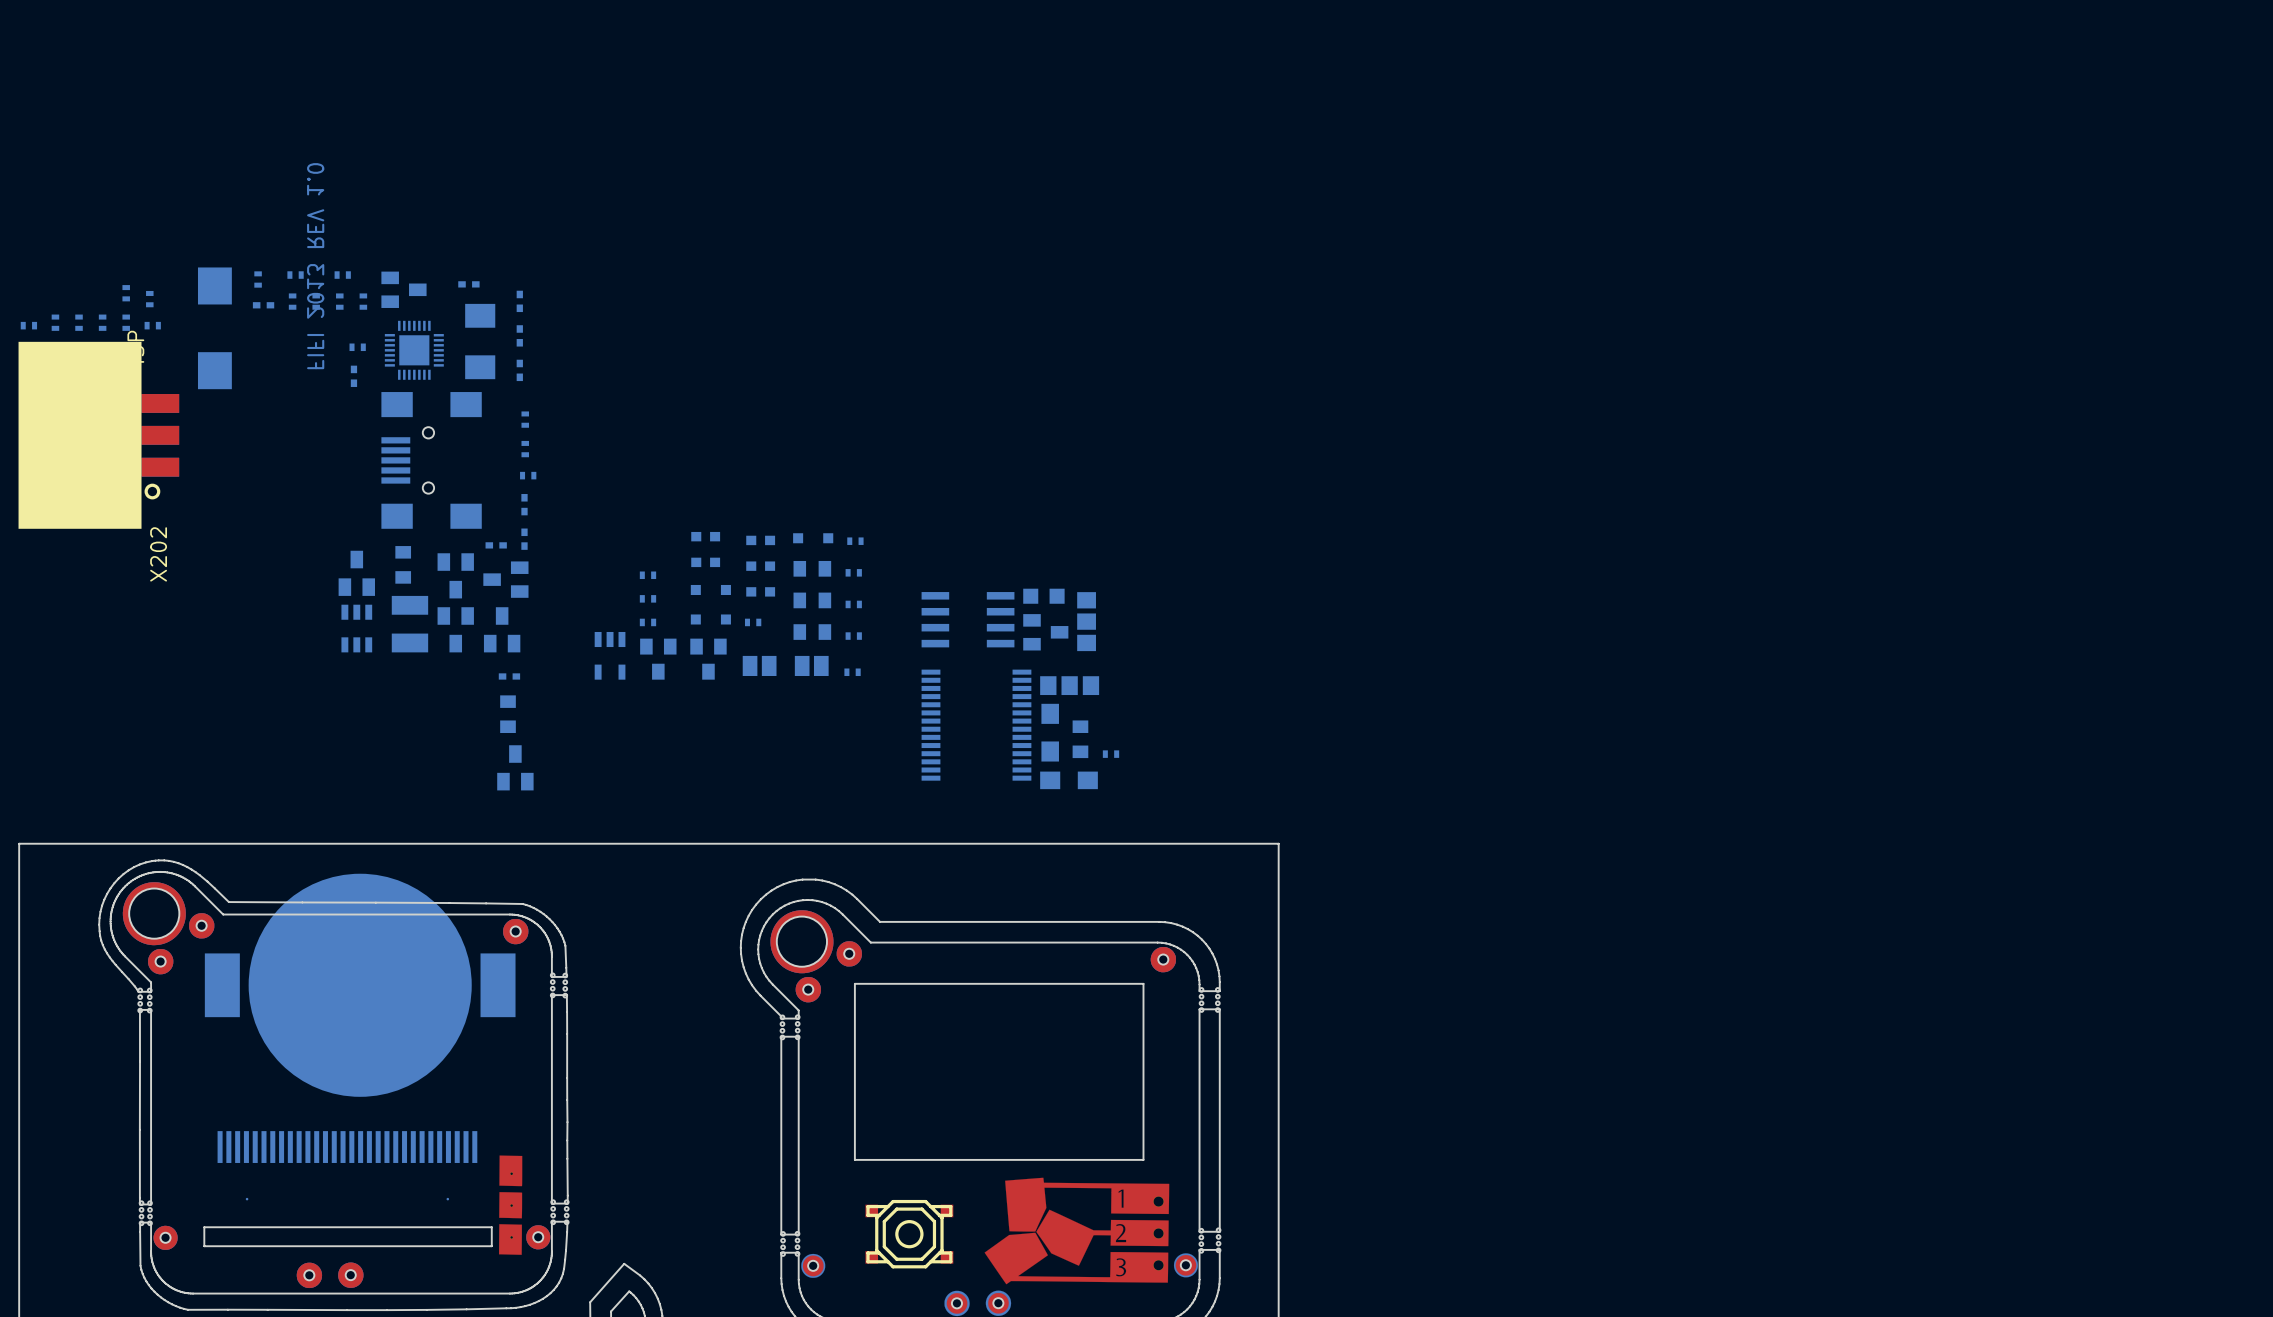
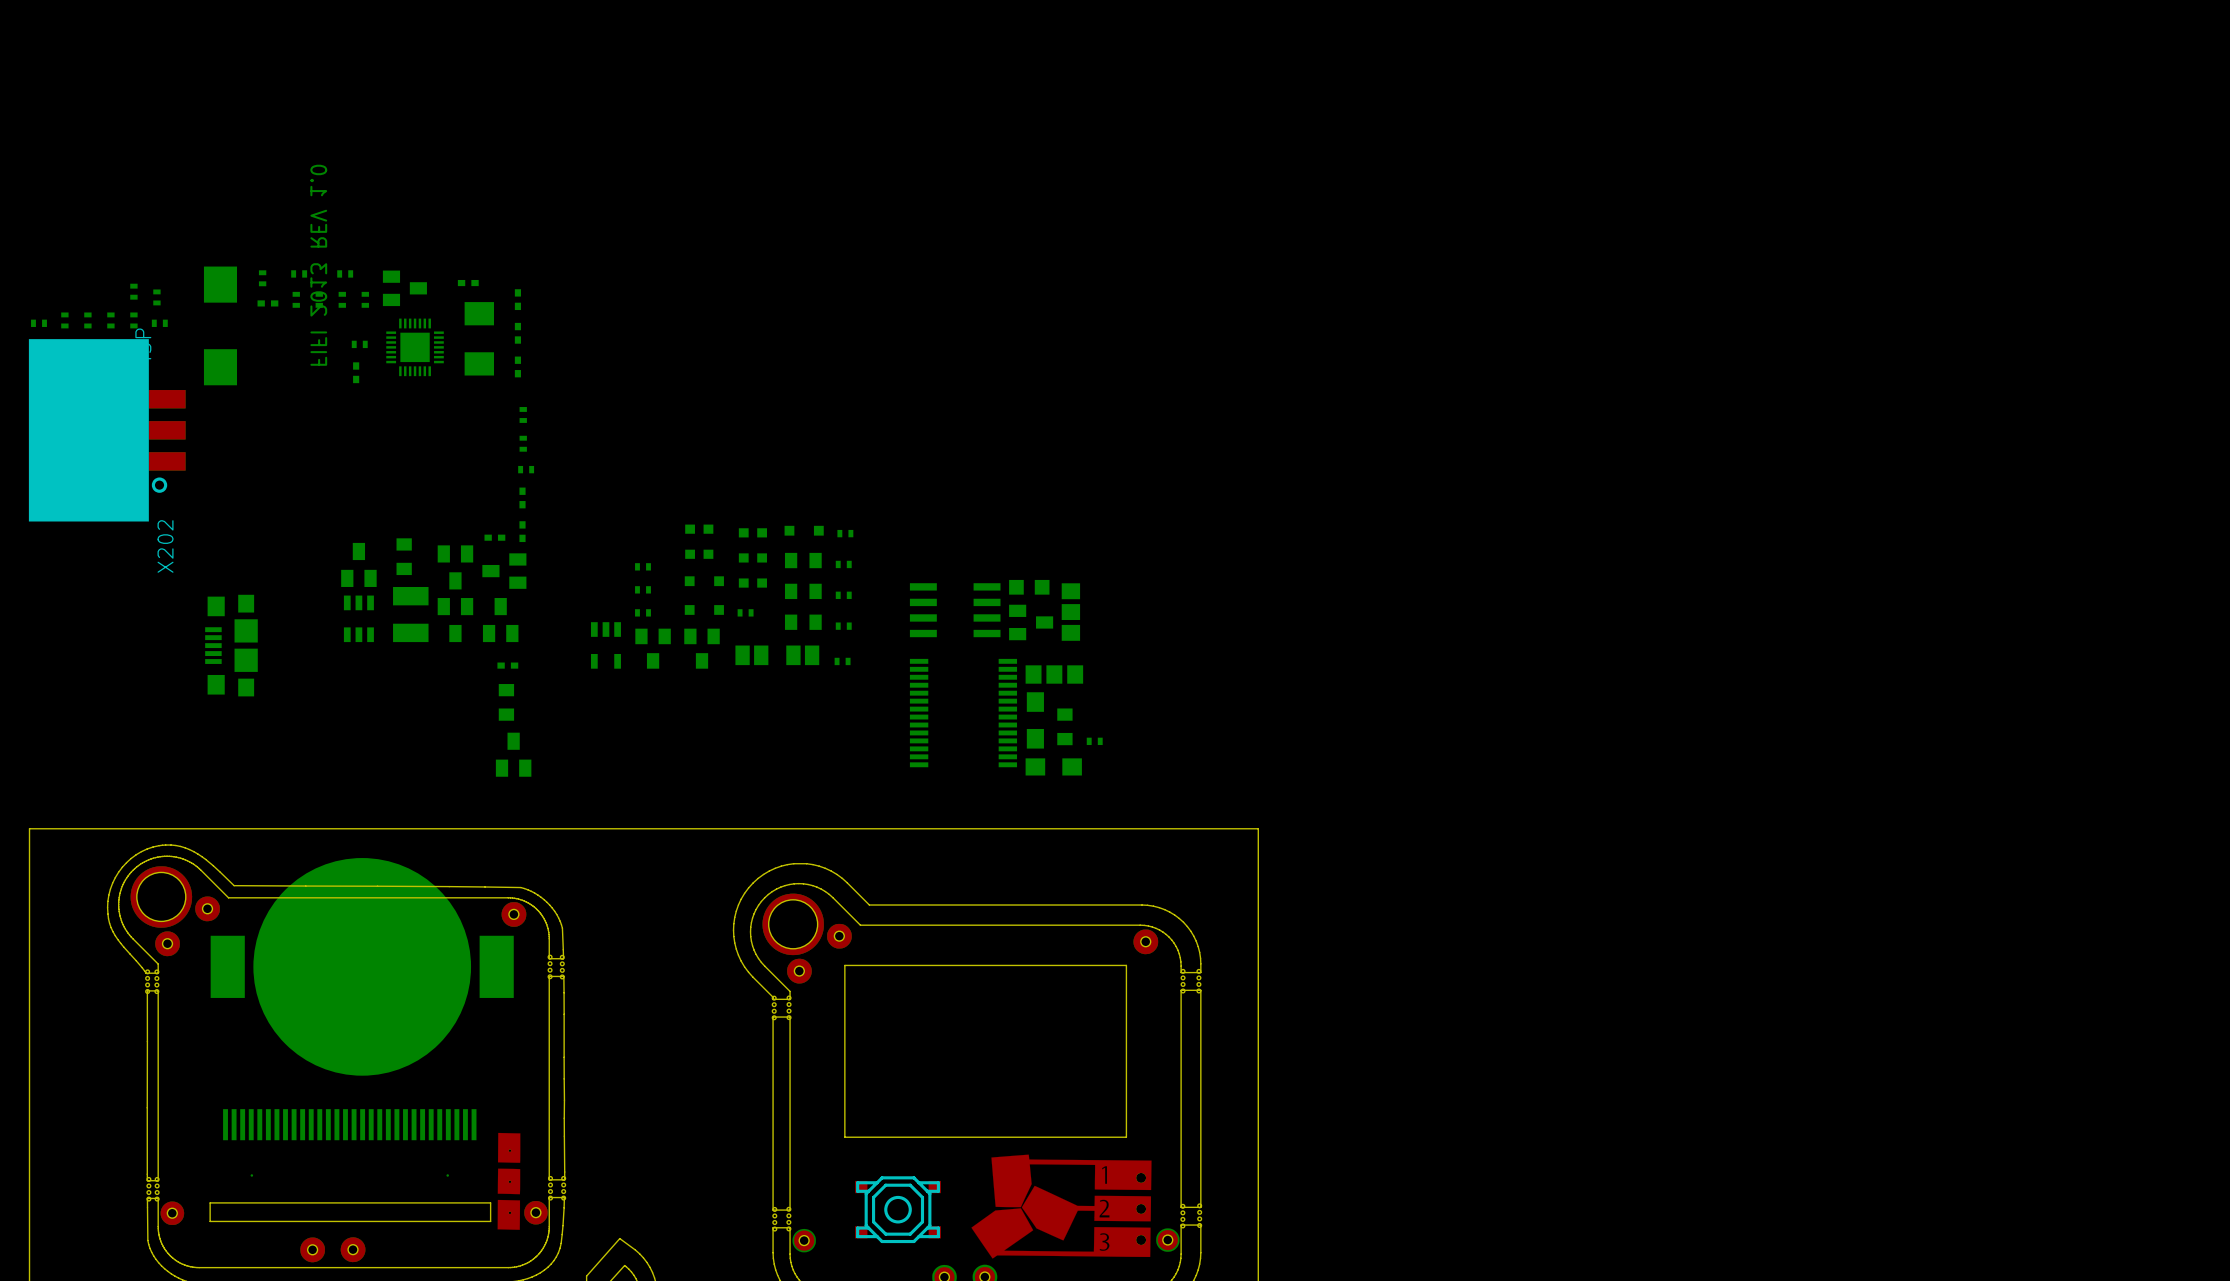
part: (431, 460) -> none
part: none -> (231, 645)

